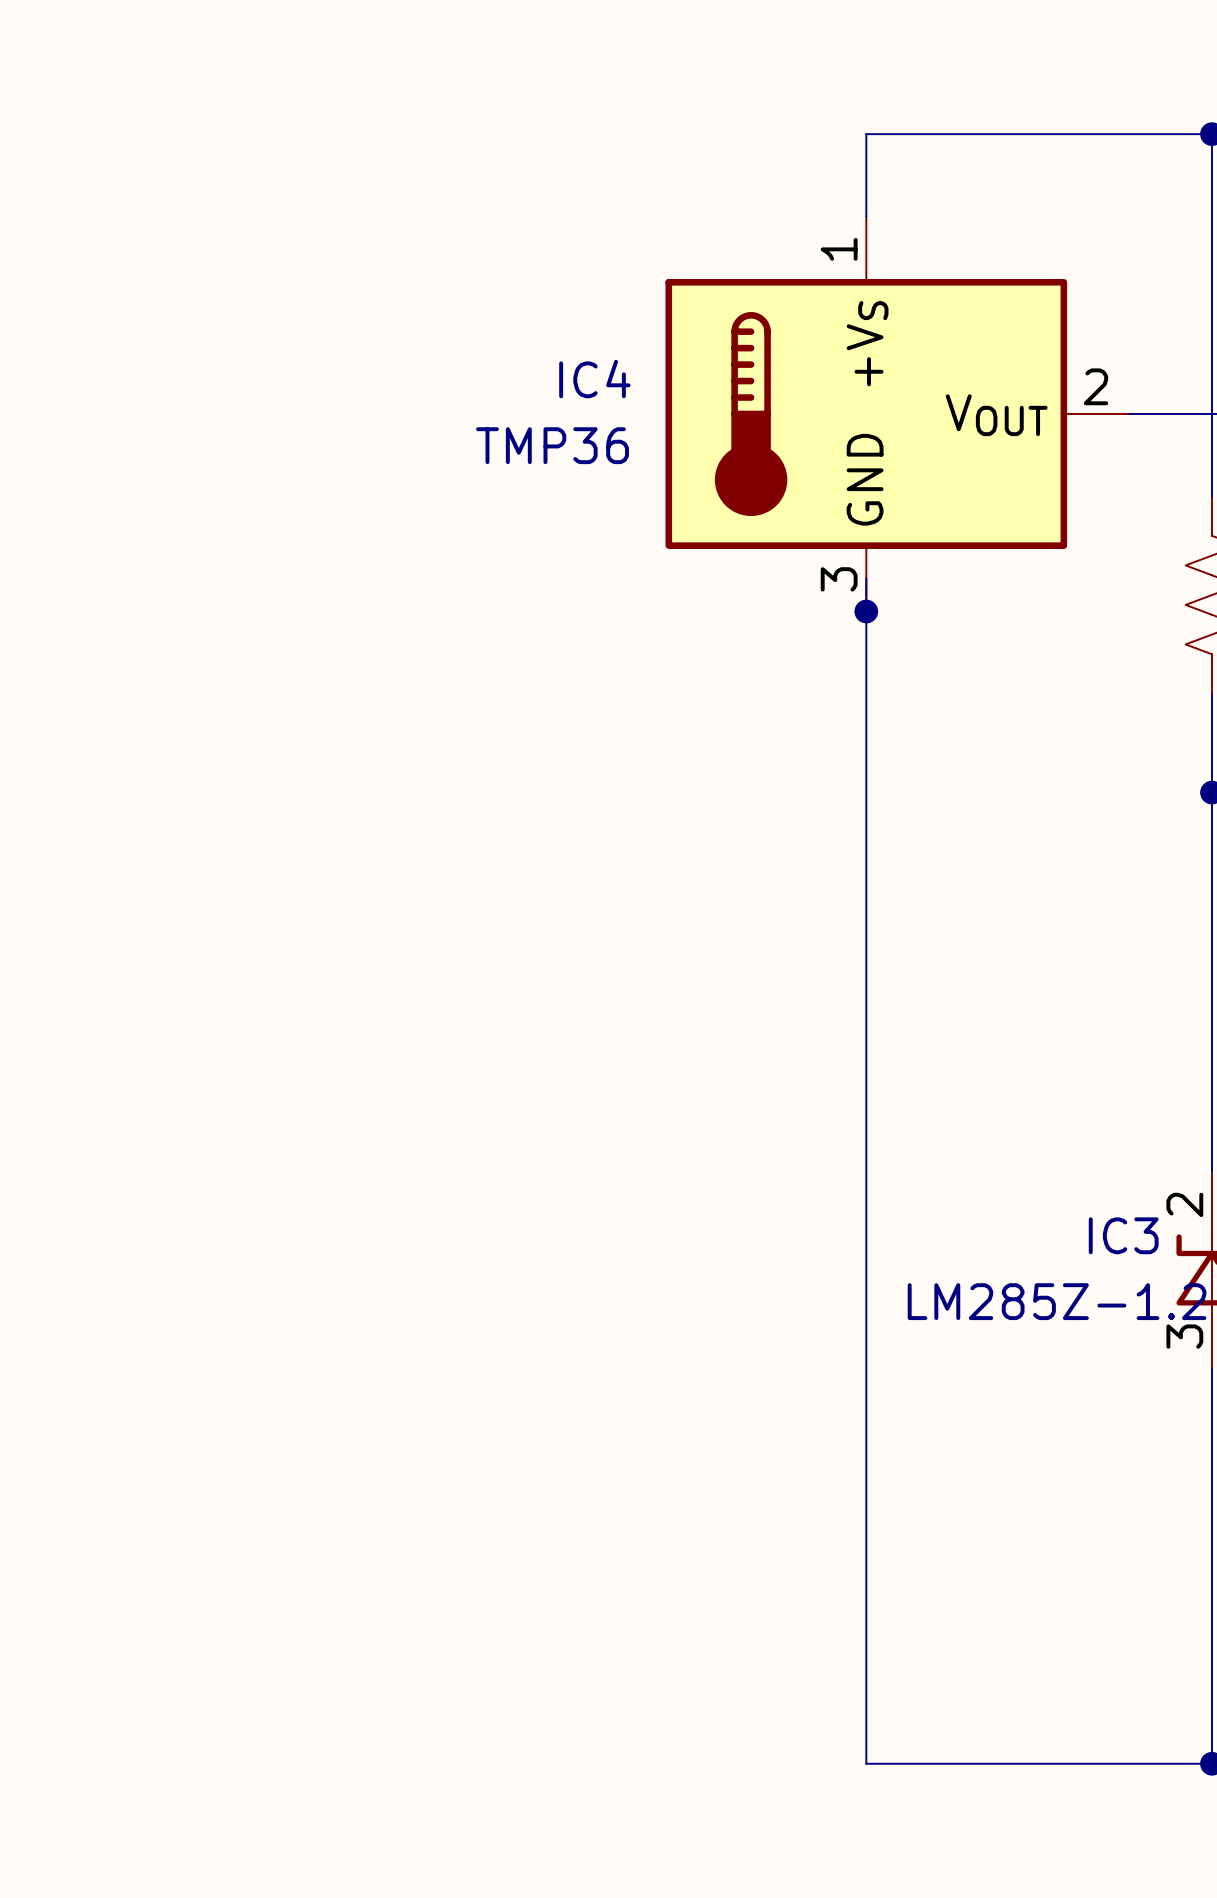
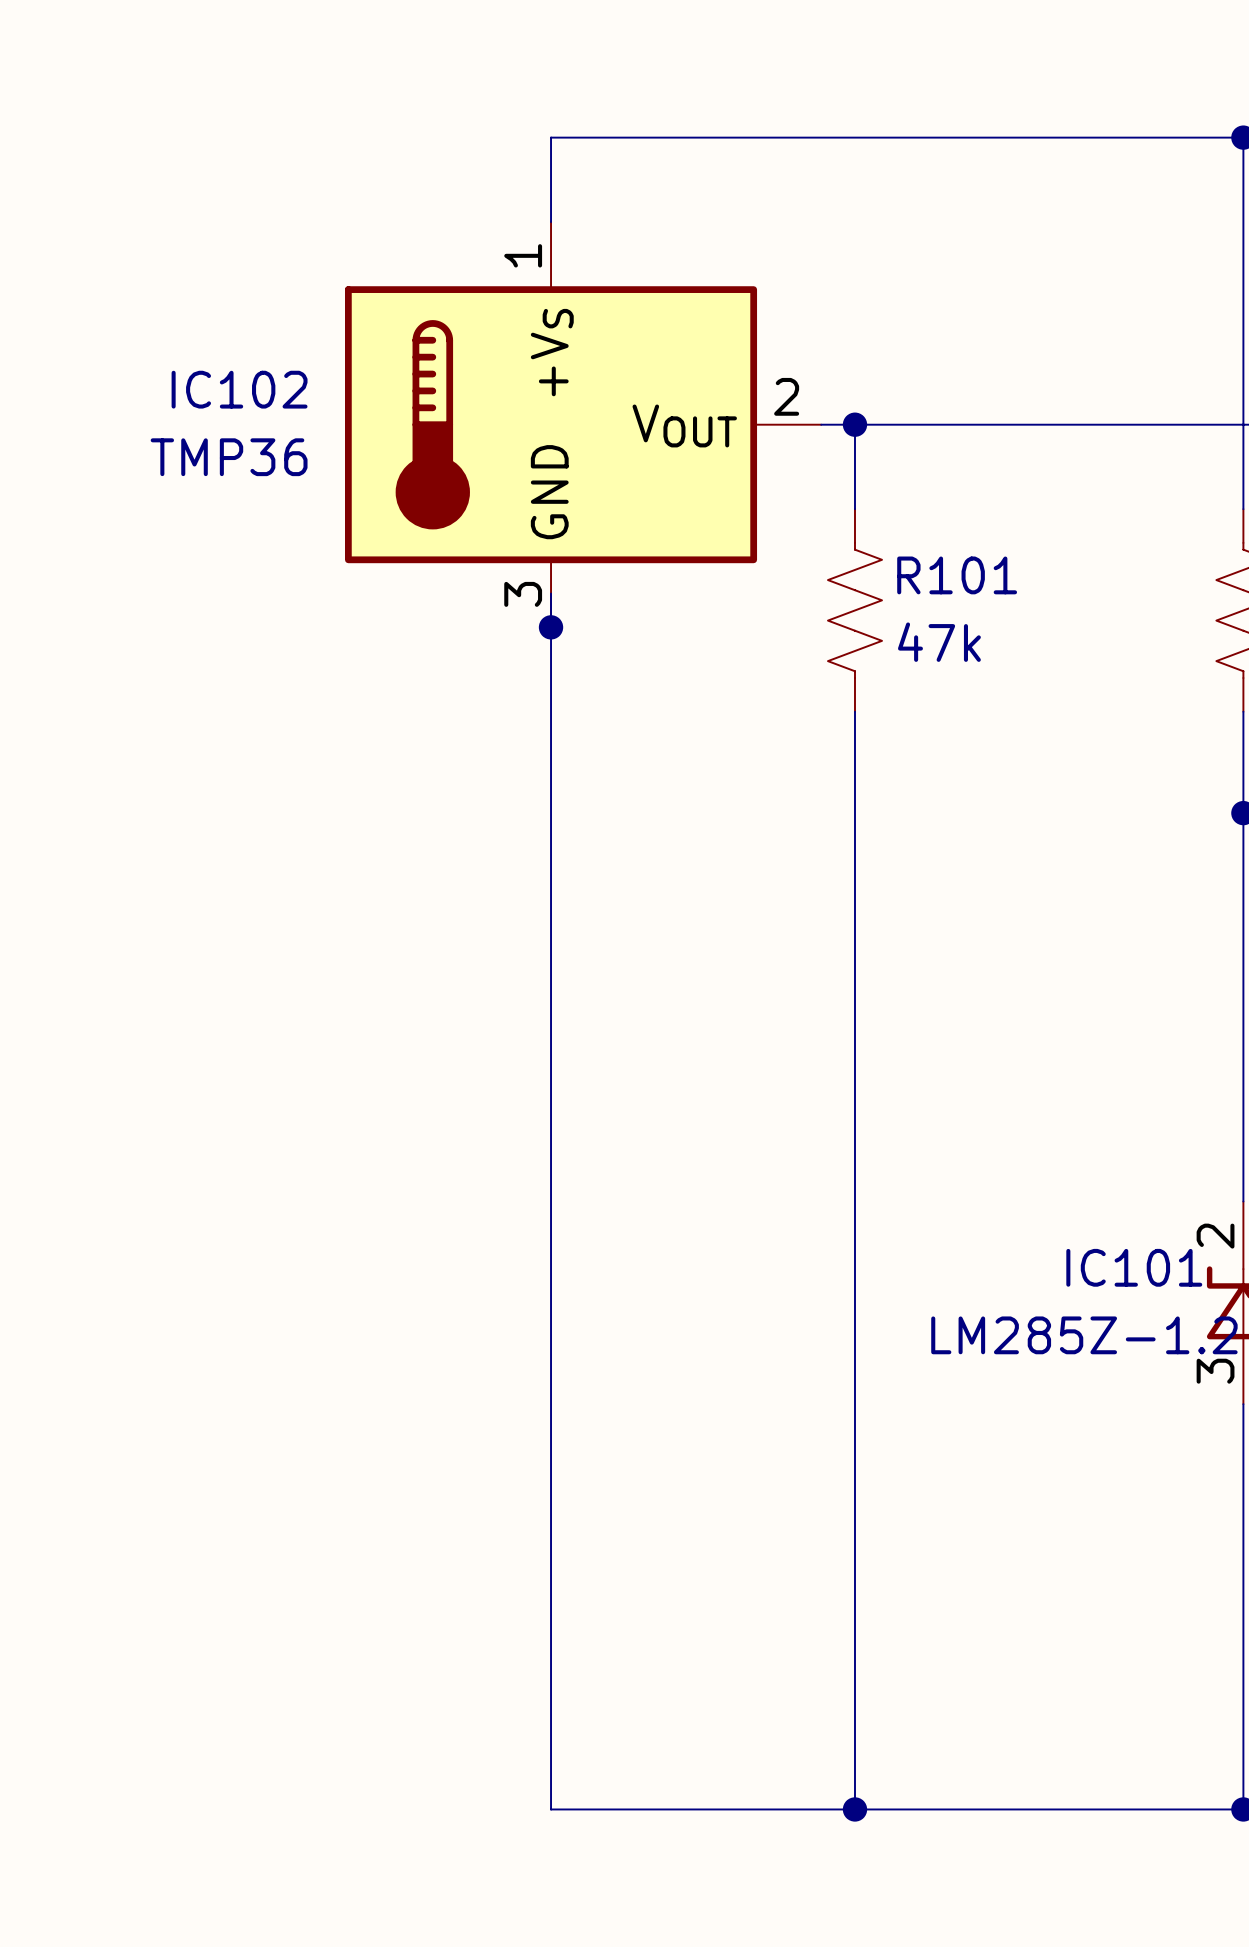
wire: (866, 134) (866, 216) -> (888, 137) (551, 137) (551, 222)
IC102: none -> TMP36 (583, 424)
junction: none -> (854, 424)
IC4: TMP36 (897, 413) -> none
wire: (866, 578) (866, 1763) -> (551, 593) (551, 1809) (888, 1809)
R101: none -> 47k (854, 610)
junction: none -> (551, 627)
junction: (866, 611) -> none
wire: none -> (854, 711) (854, 1809)
IC3 name: IC3 (1123, 1235) -> IC101 (1134, 1267)
junction: none -> (854, 1809)

